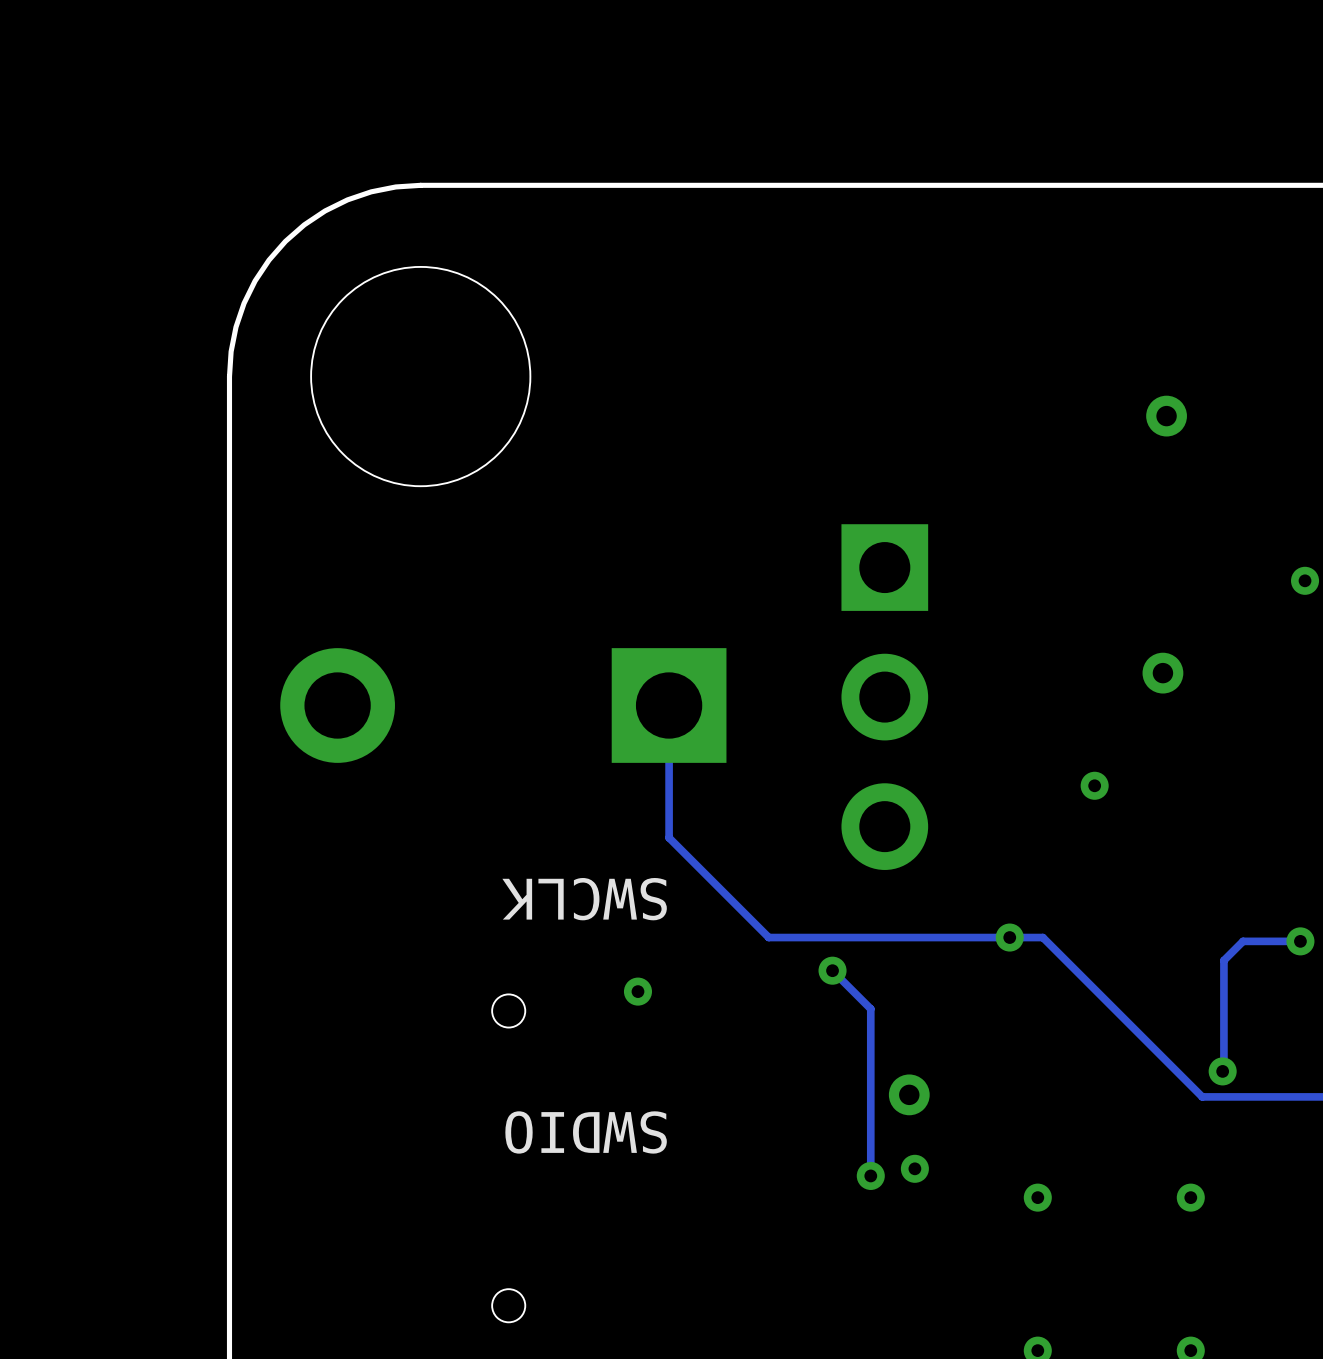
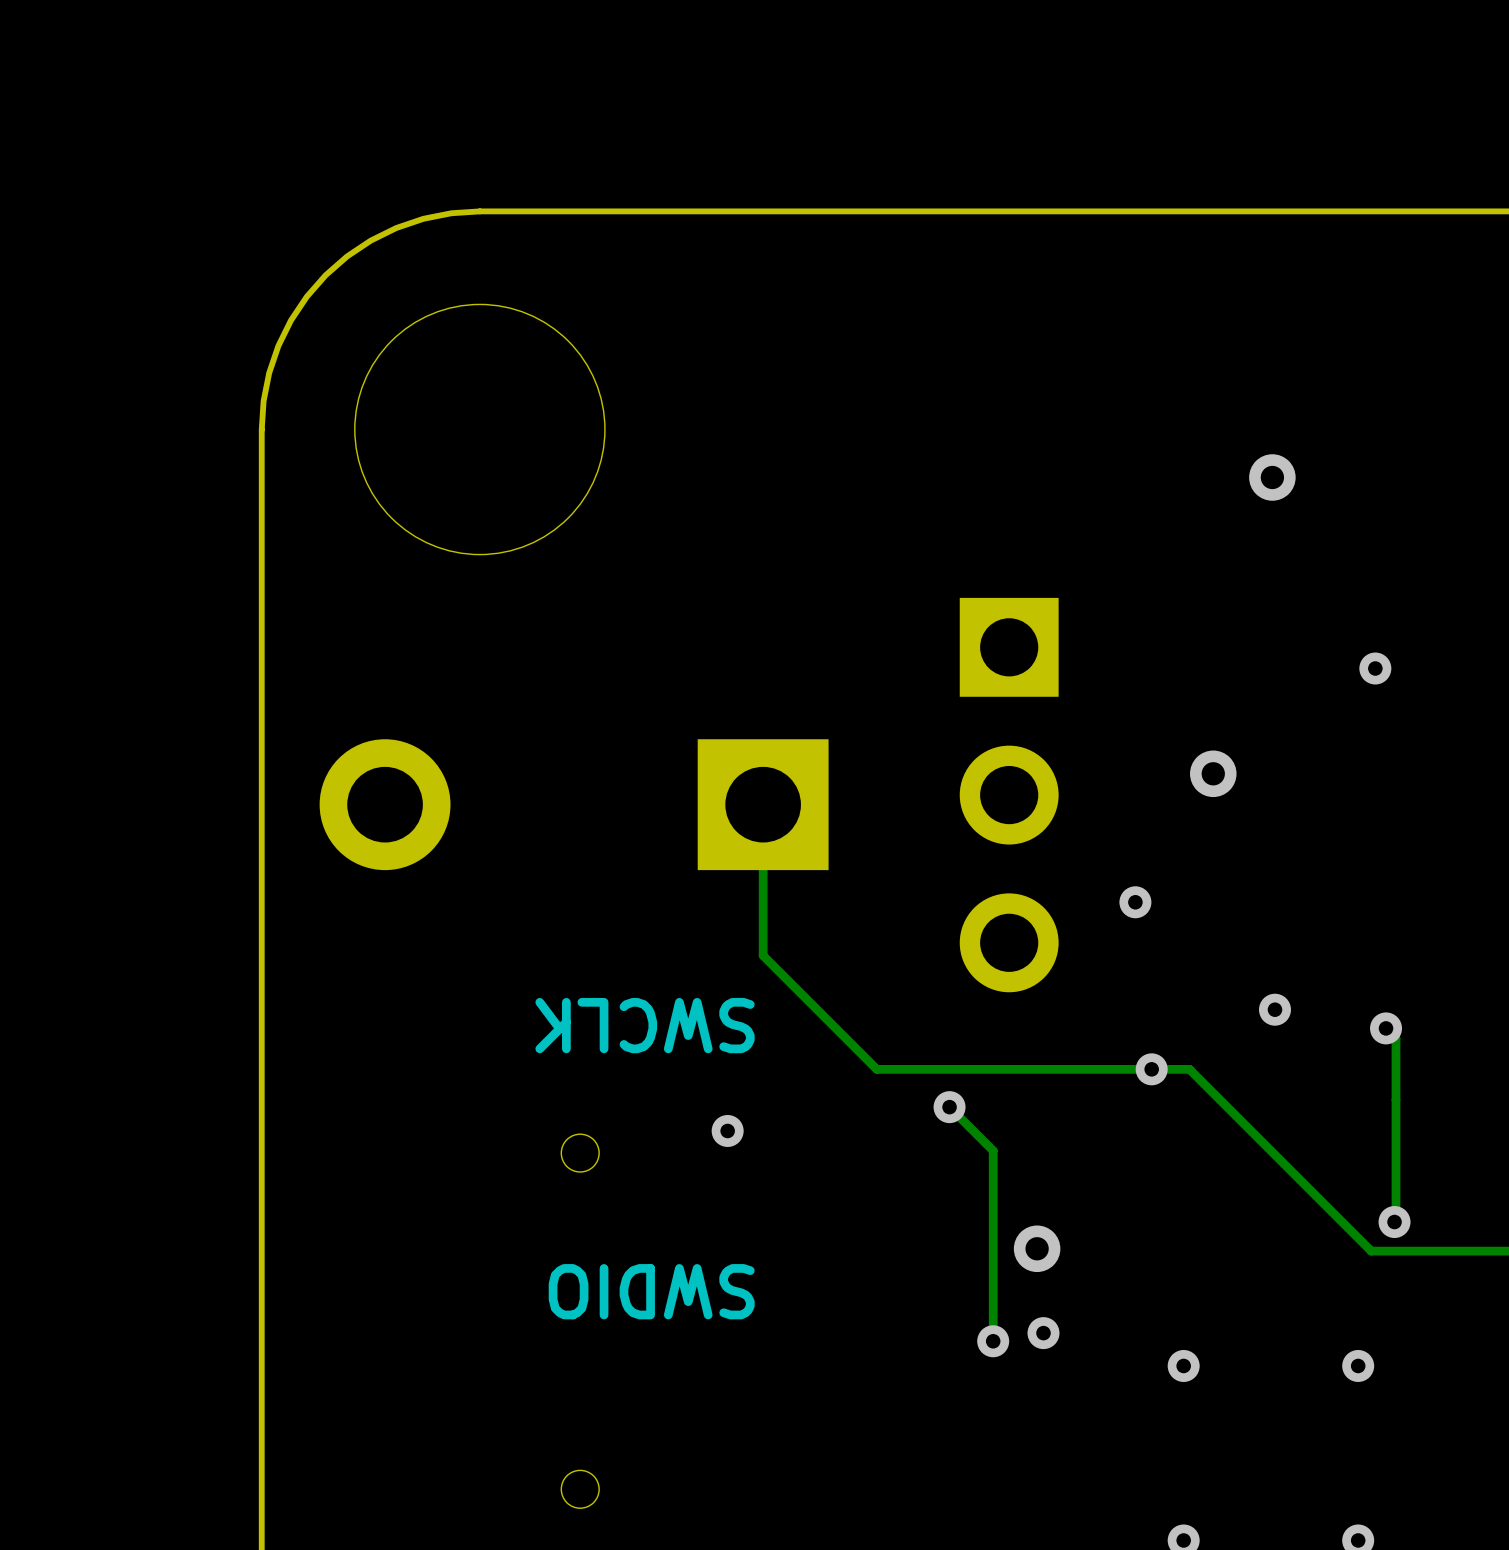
via position: (1166, 416) -> (1272, 477)
via position: (1305, 580) -> (1375, 668)
via position: (1162, 673) -> (1213, 773)
via: (1094, 785) -> none
via: none -> (1135, 902)
via: none -> (1274, 1009)
via: none -> (1386, 1028)
track: (1300, 941) (1243, 941) (1223, 960) -> (1386, 1028) (1395, 1038) (1395, 1095)
via: (1300, 941) -> none

